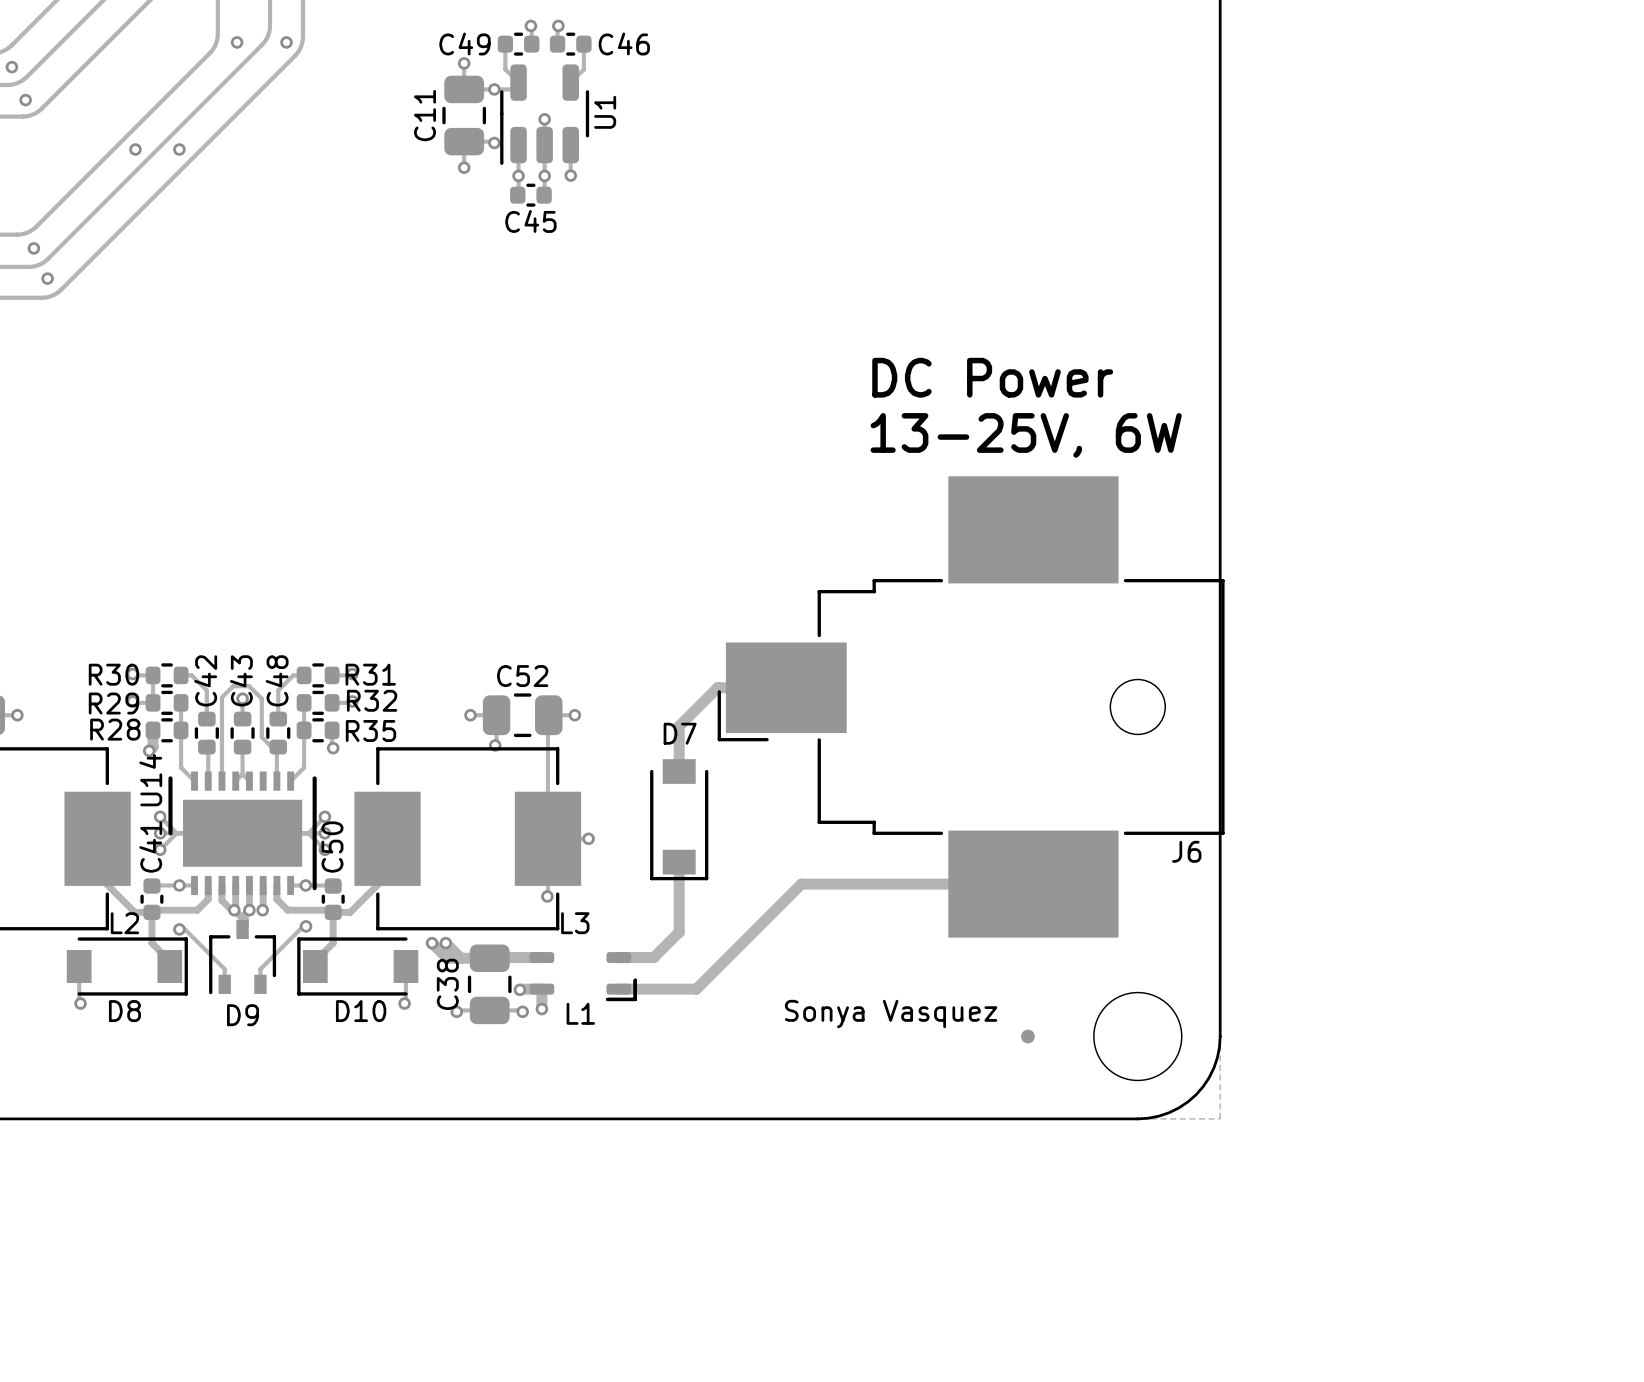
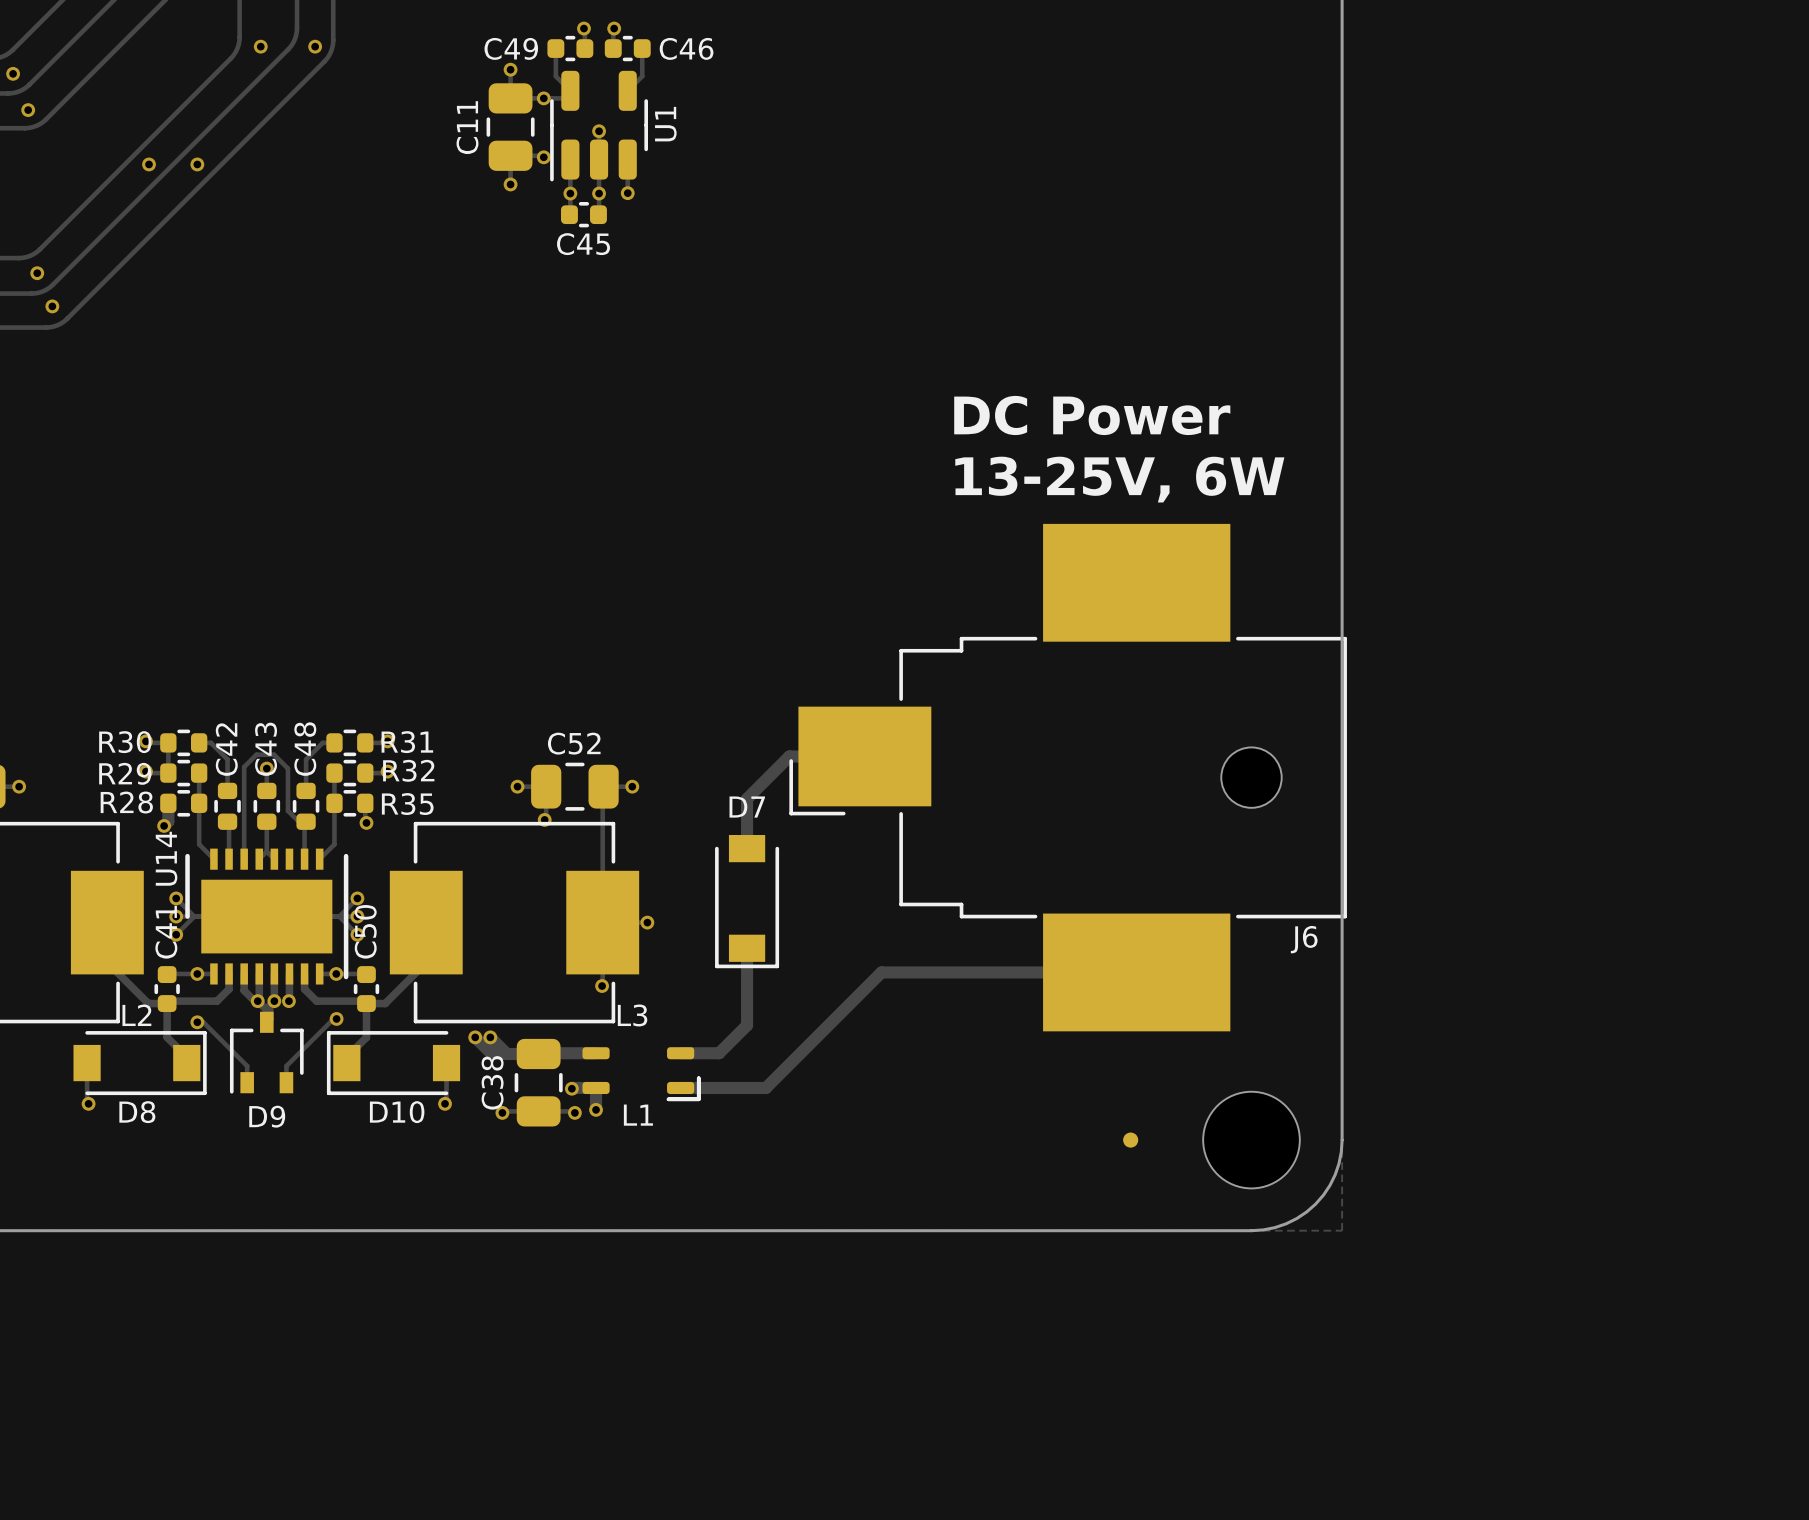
text: Sonya Vasquez (891, 1014) -> none

